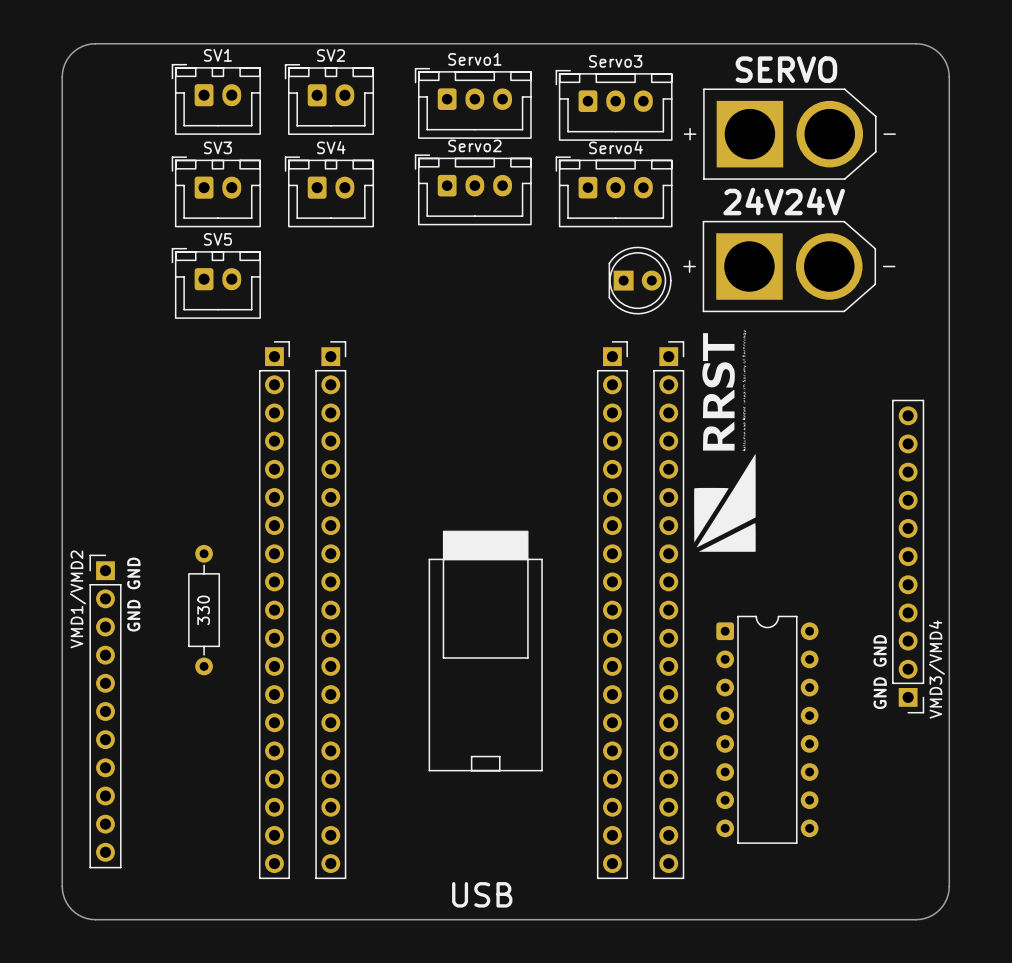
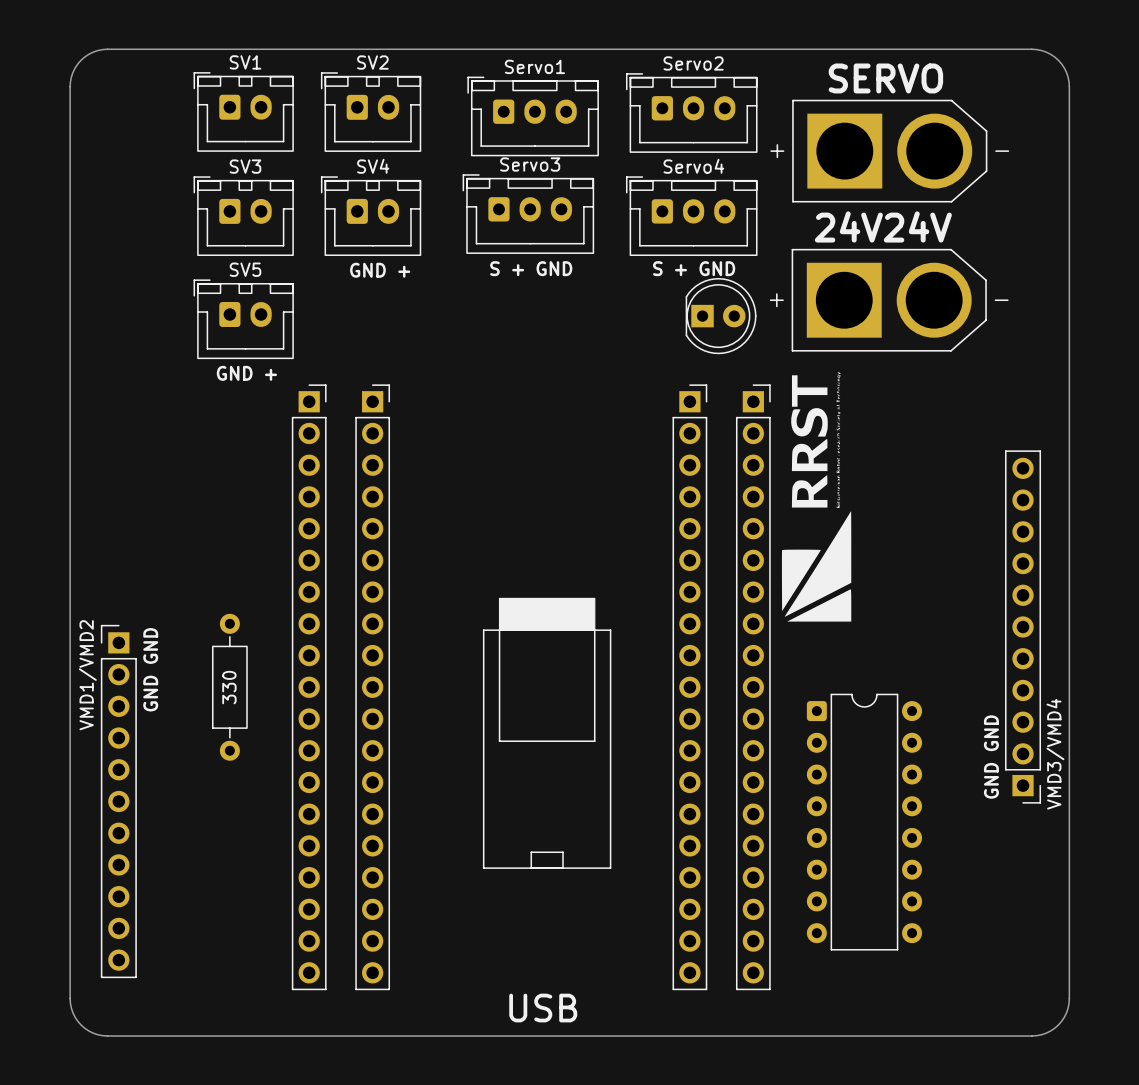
Servo3 position: (614, 105) -> (528, 214)
Servo2 position: (473, 189) -> (691, 113)
text: none -> S + GND (531, 268)
text: none -> S + GND (694, 268)
text: none -> GND + (380, 270)
text: none -> GND + (246, 373)

